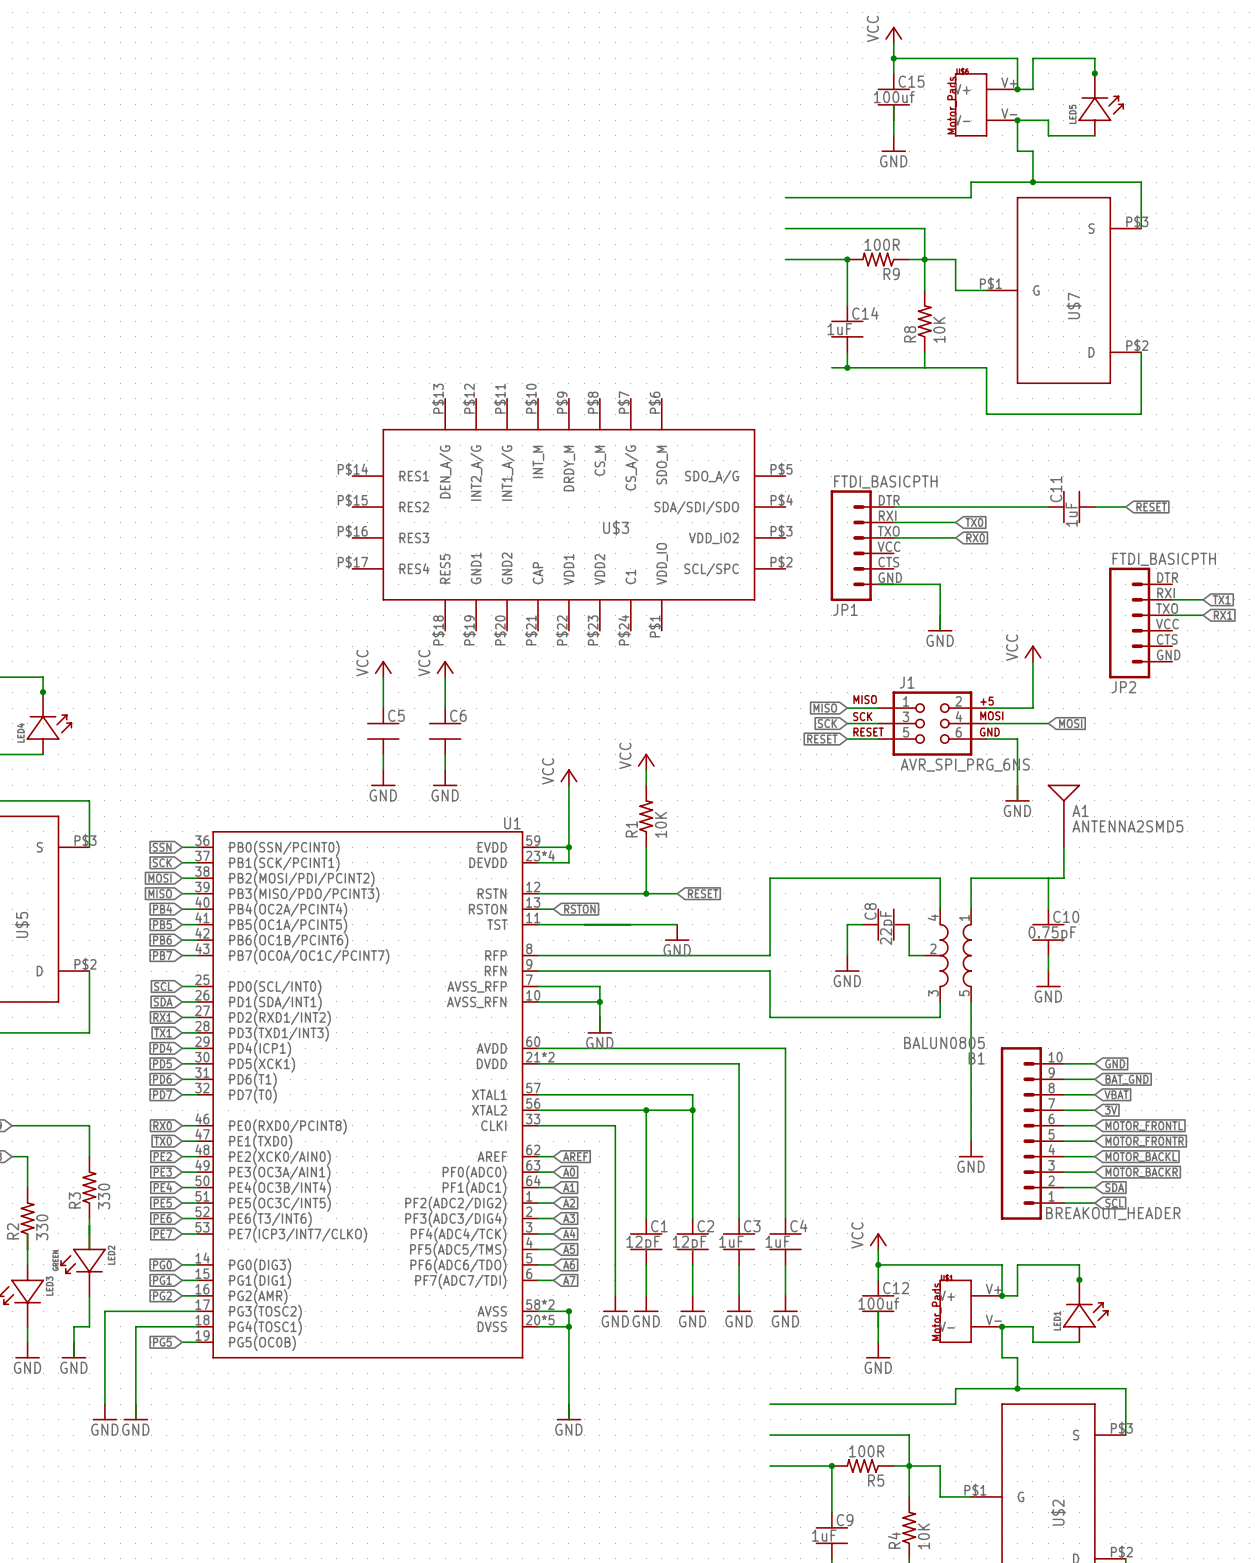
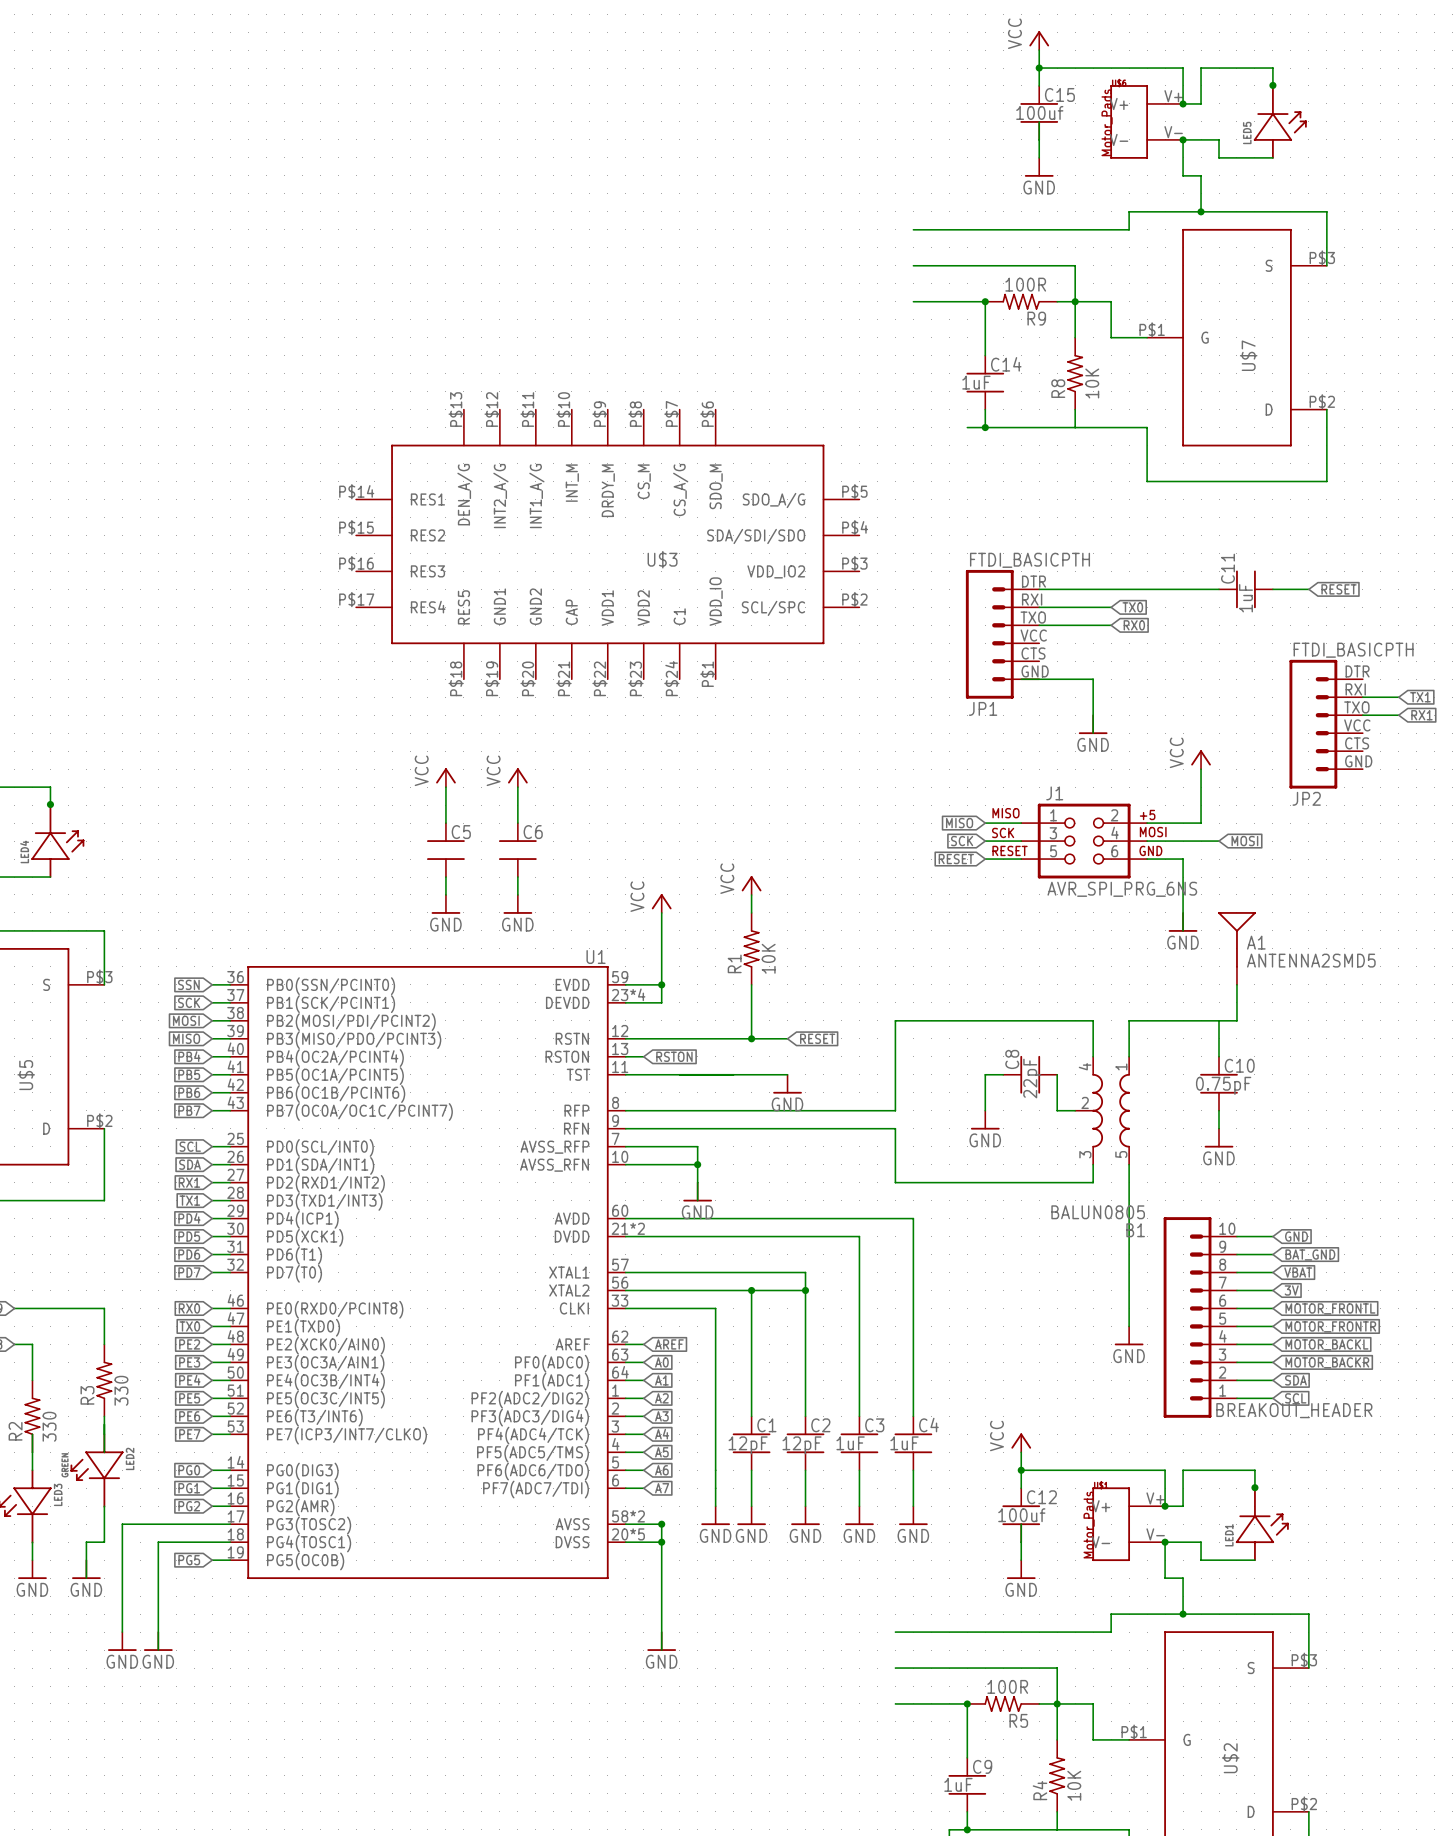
U$3 position: (568, 514) -> (607, 544)

